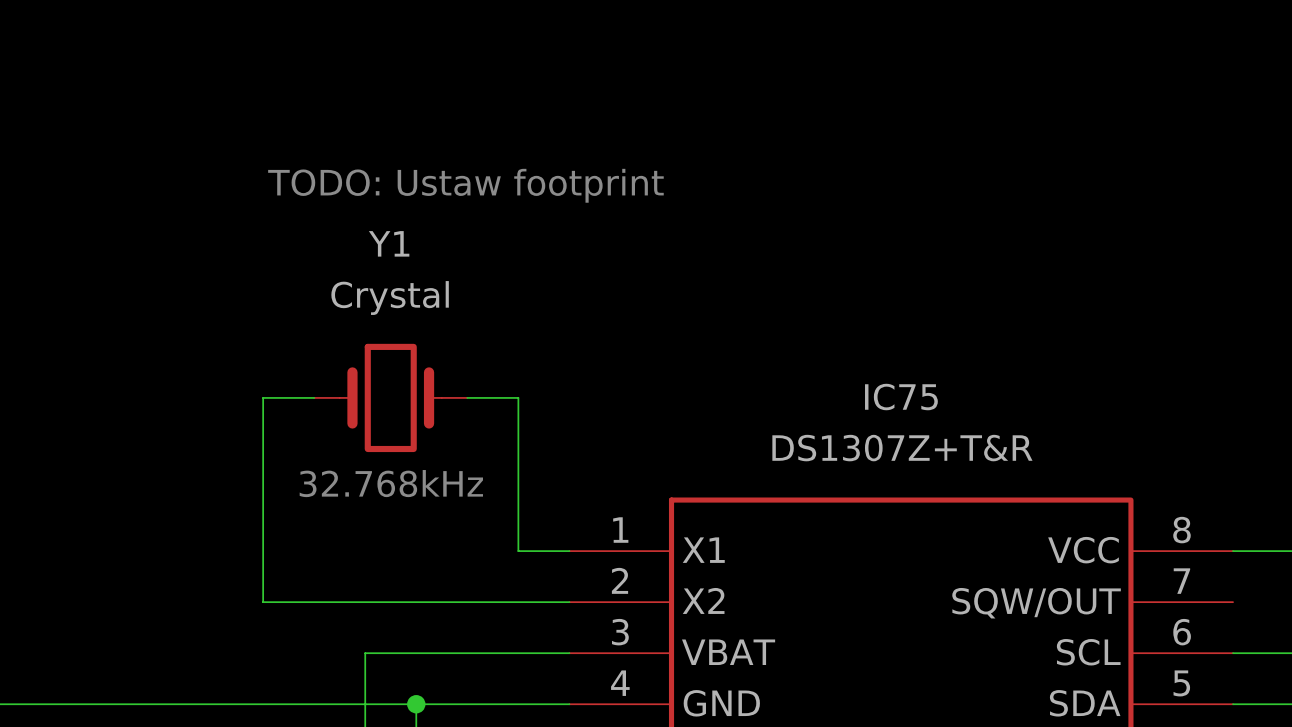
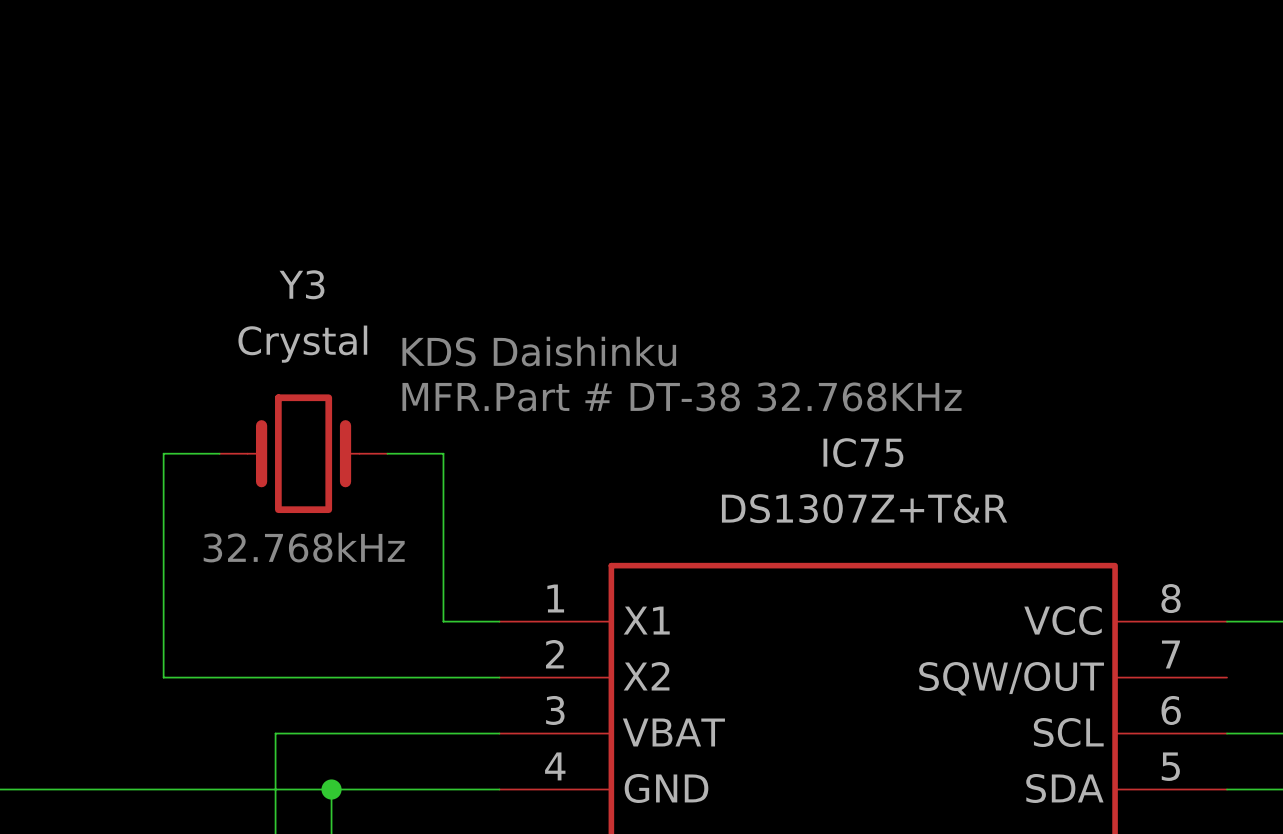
text: TODO: Ustaw footprint (465, 185) -> none
Y1 name: Y1 (389, 243) -> Y3 (301, 284)
text: none -> KDS Daishinku (539, 351)
text: none -> MFR.Part # DT-38 32.768KHz (682, 396)

